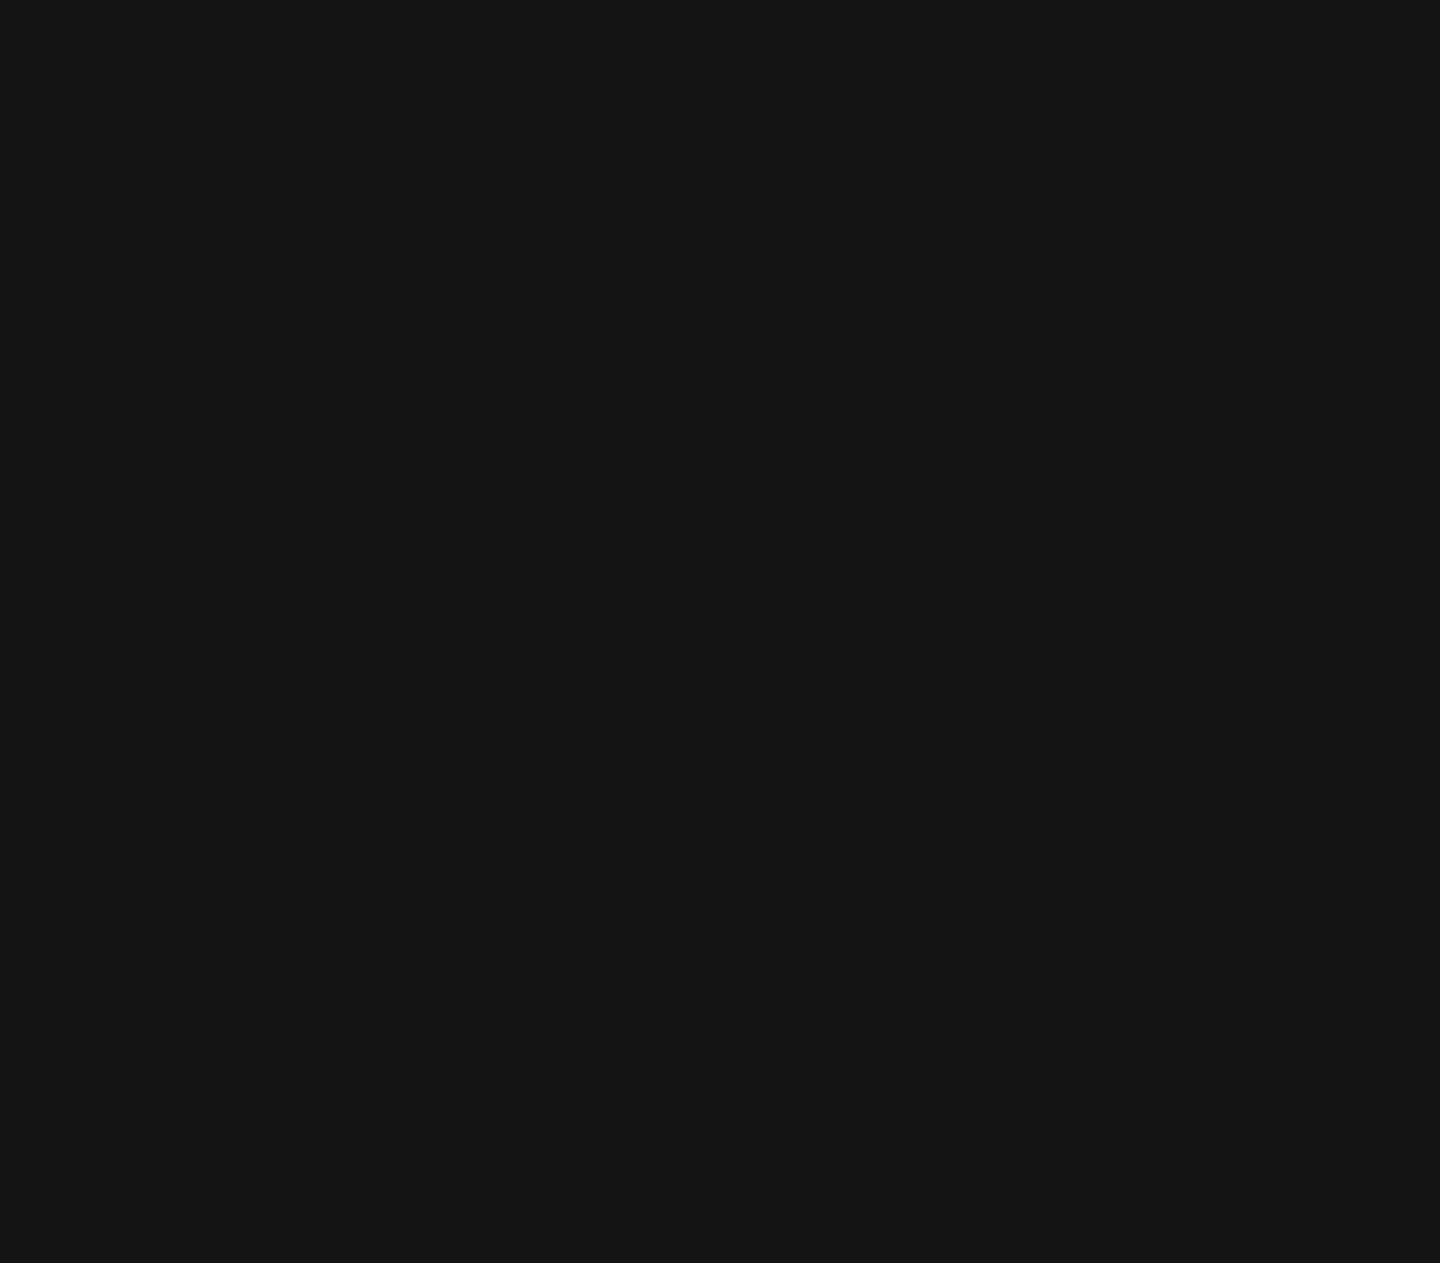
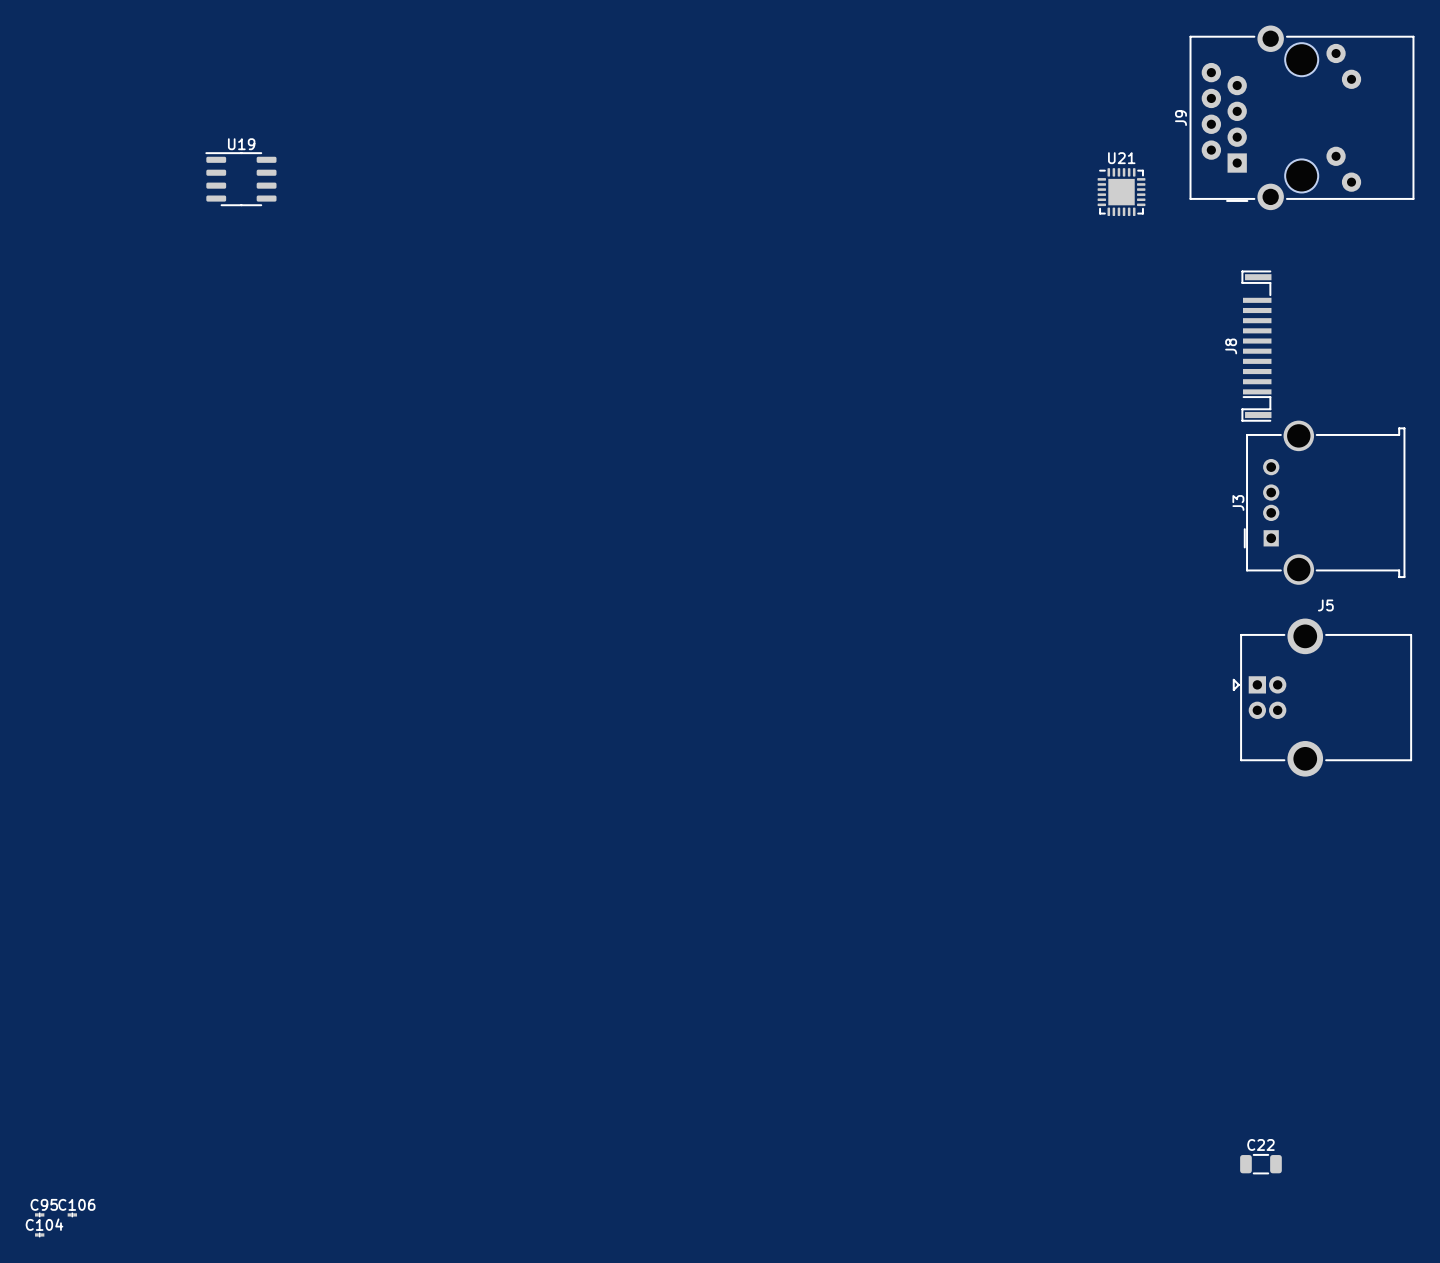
J9: none -> (1301, 117)
U19: none -> (241, 179)
U21: none -> (1121, 192)
J8: none -> (1256, 346)
J3: none -> (1324, 502)
J5: none -> (1322, 697)
C22: none -> (1260, 1164)
C95: none -> (39, 1214)
C106: none -> (72, 1214)
C104: none -> (39, 1234)

